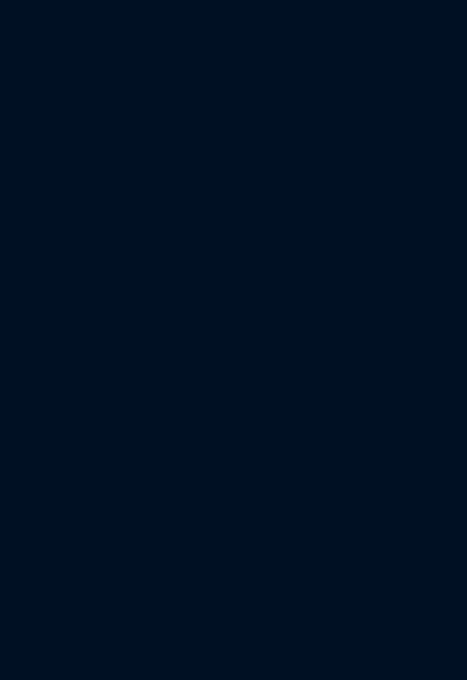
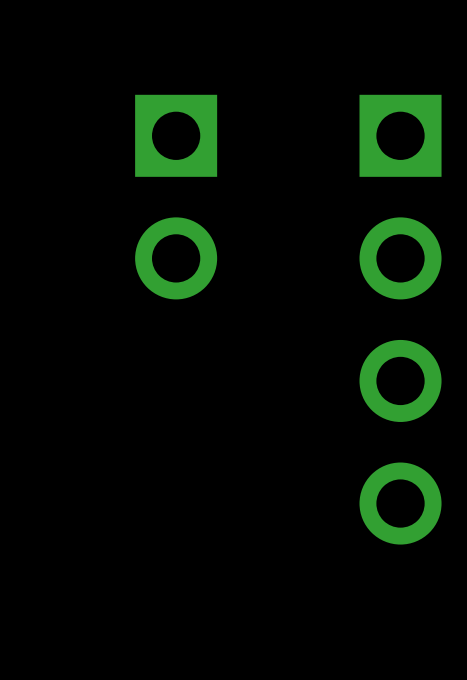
part: none -> (176, 197)
part: none -> (400, 319)

